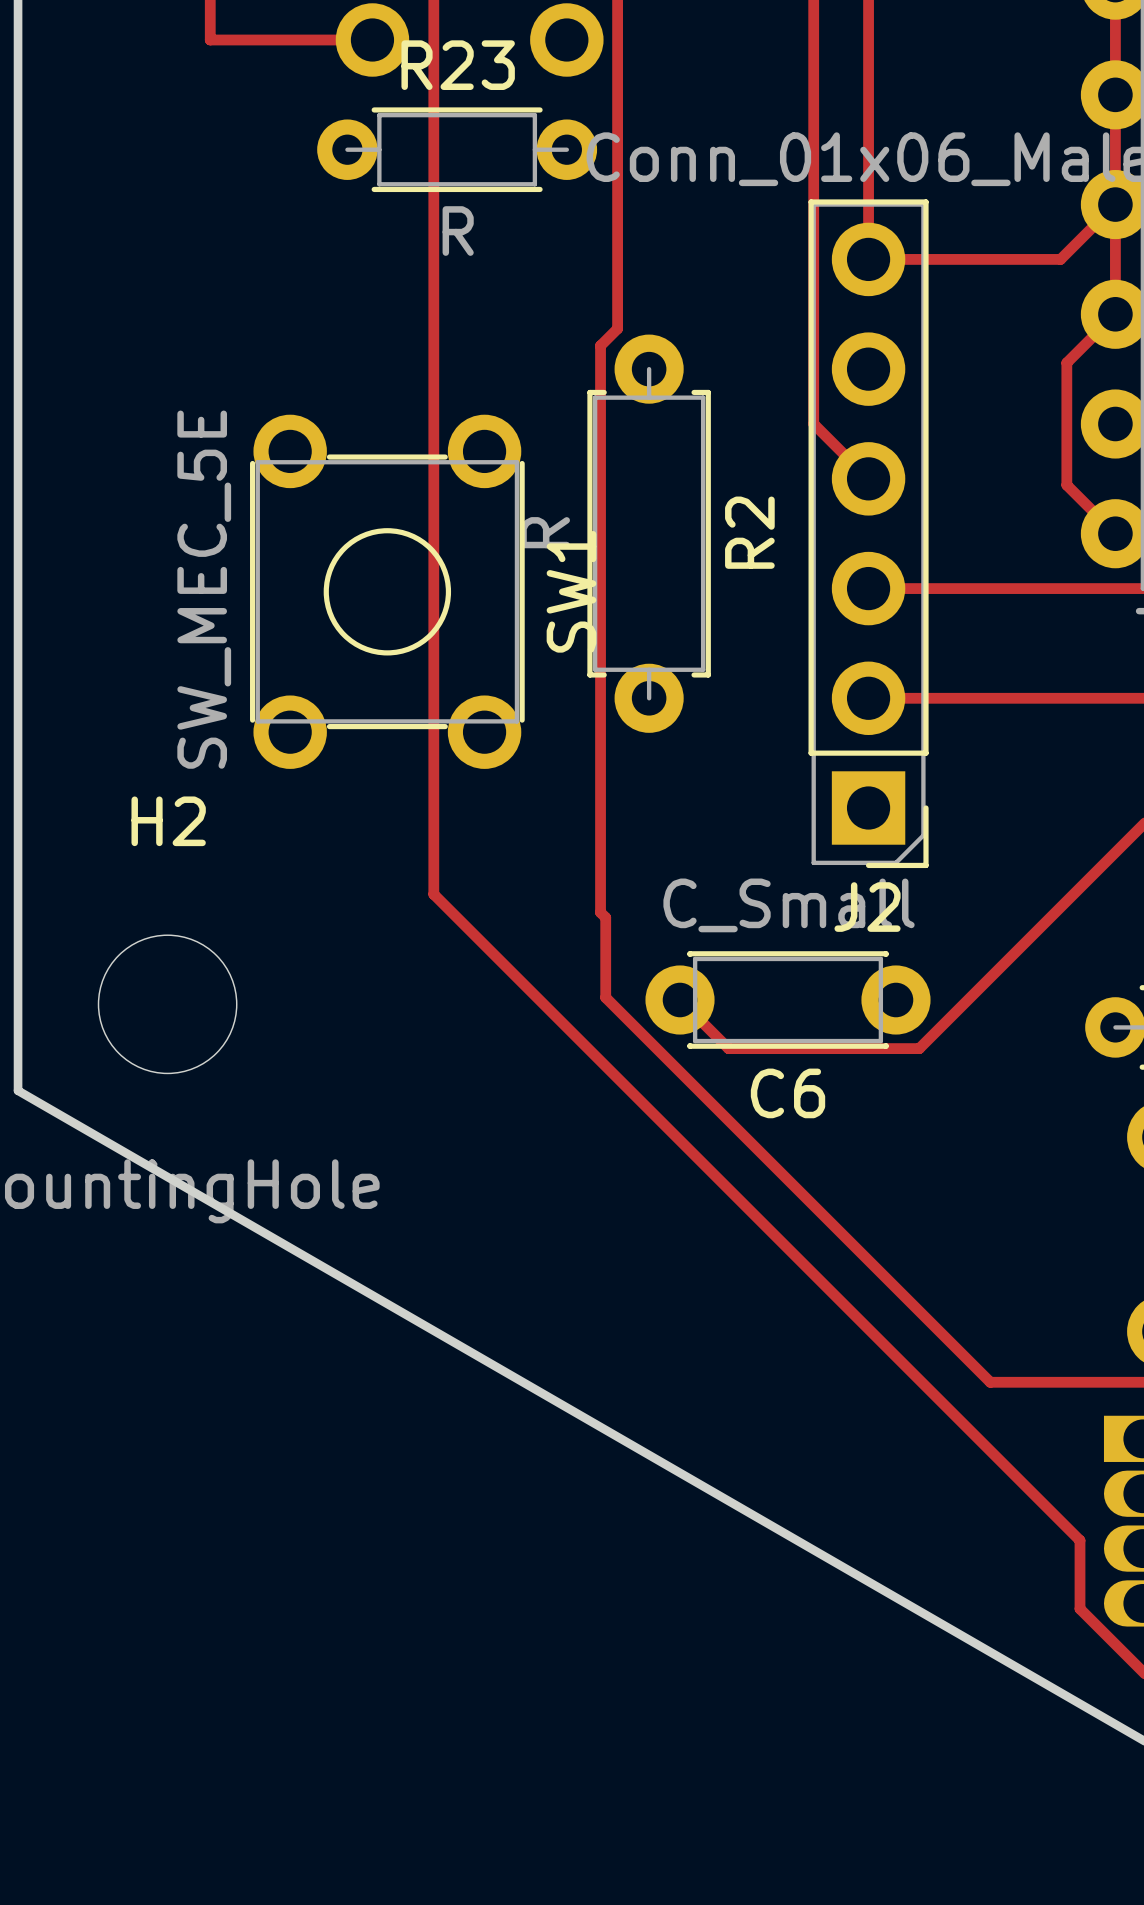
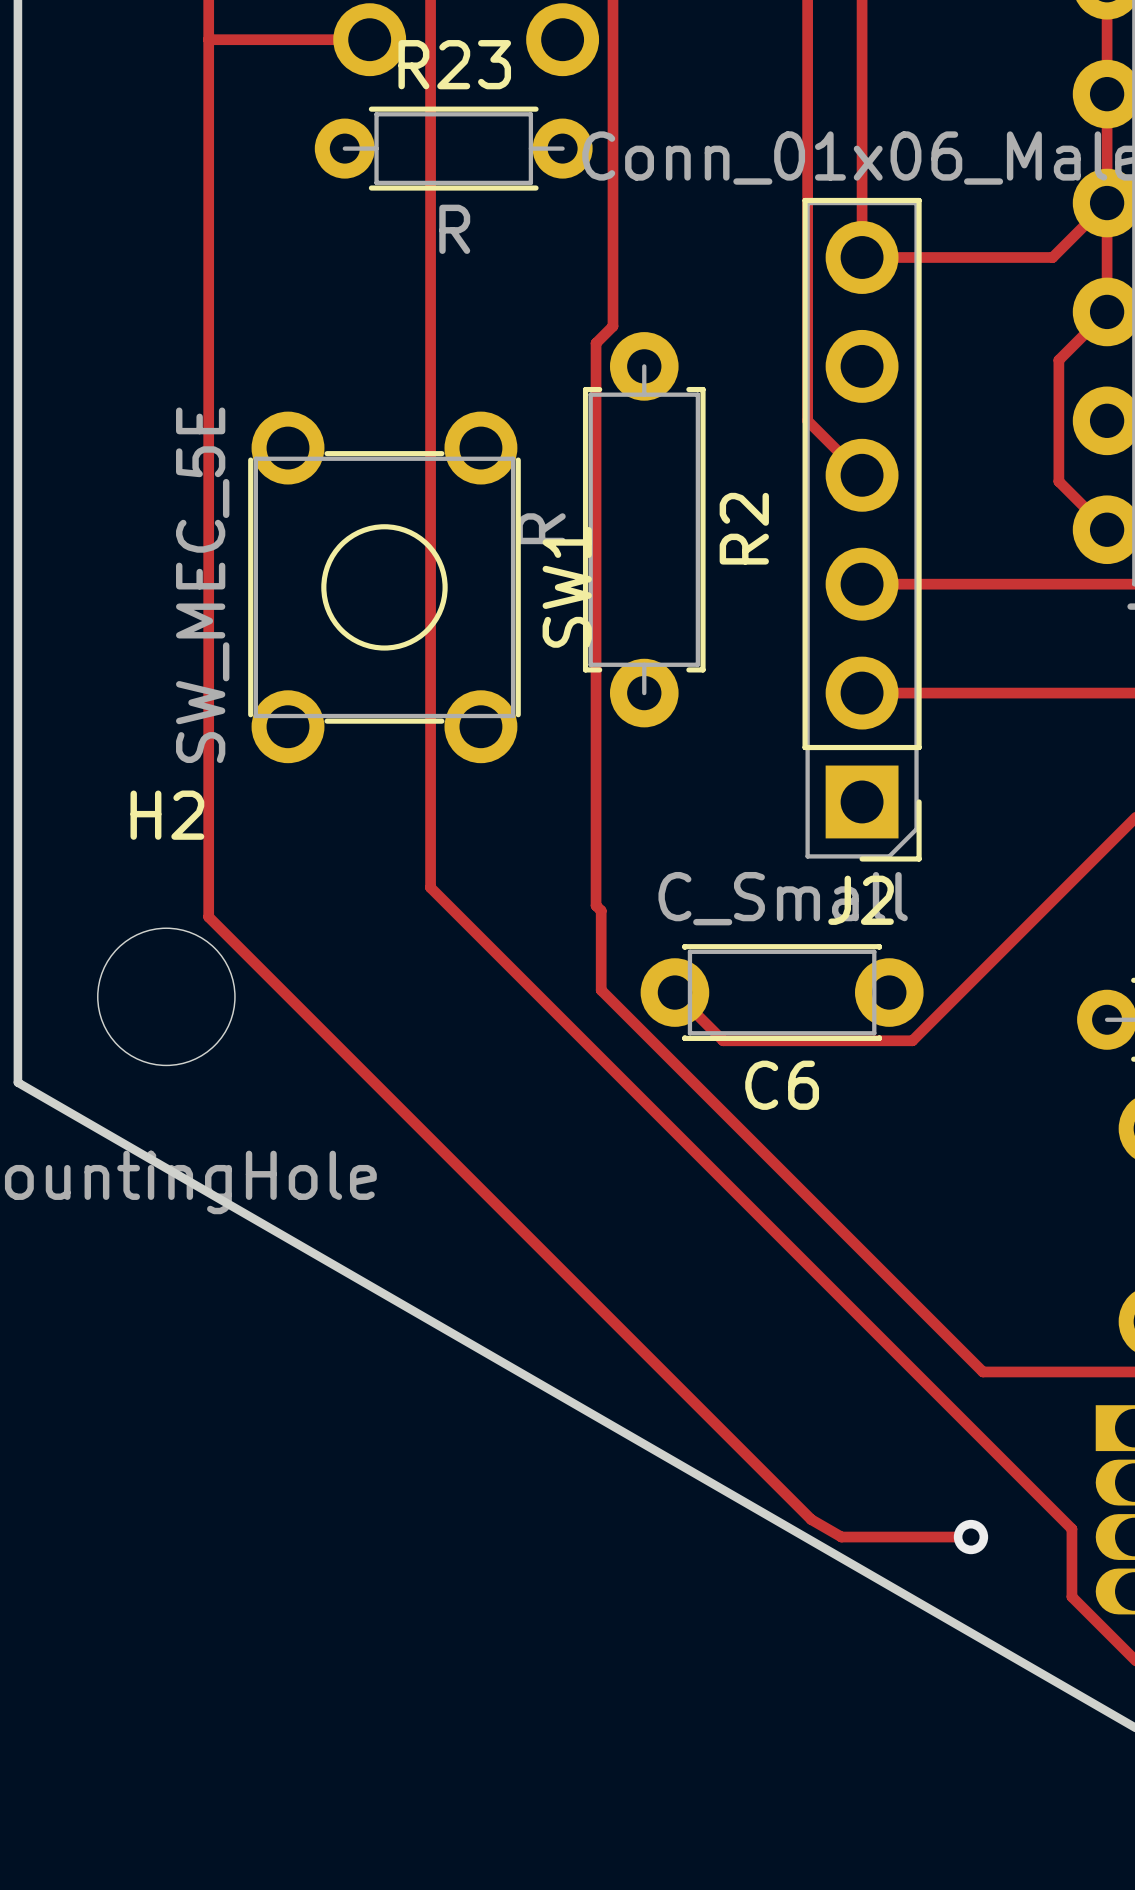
track: none -> (208, 39) (208, 917) (811, 1519) (841, 1537) (970, 1537)
via: none -> (970, 1537)

